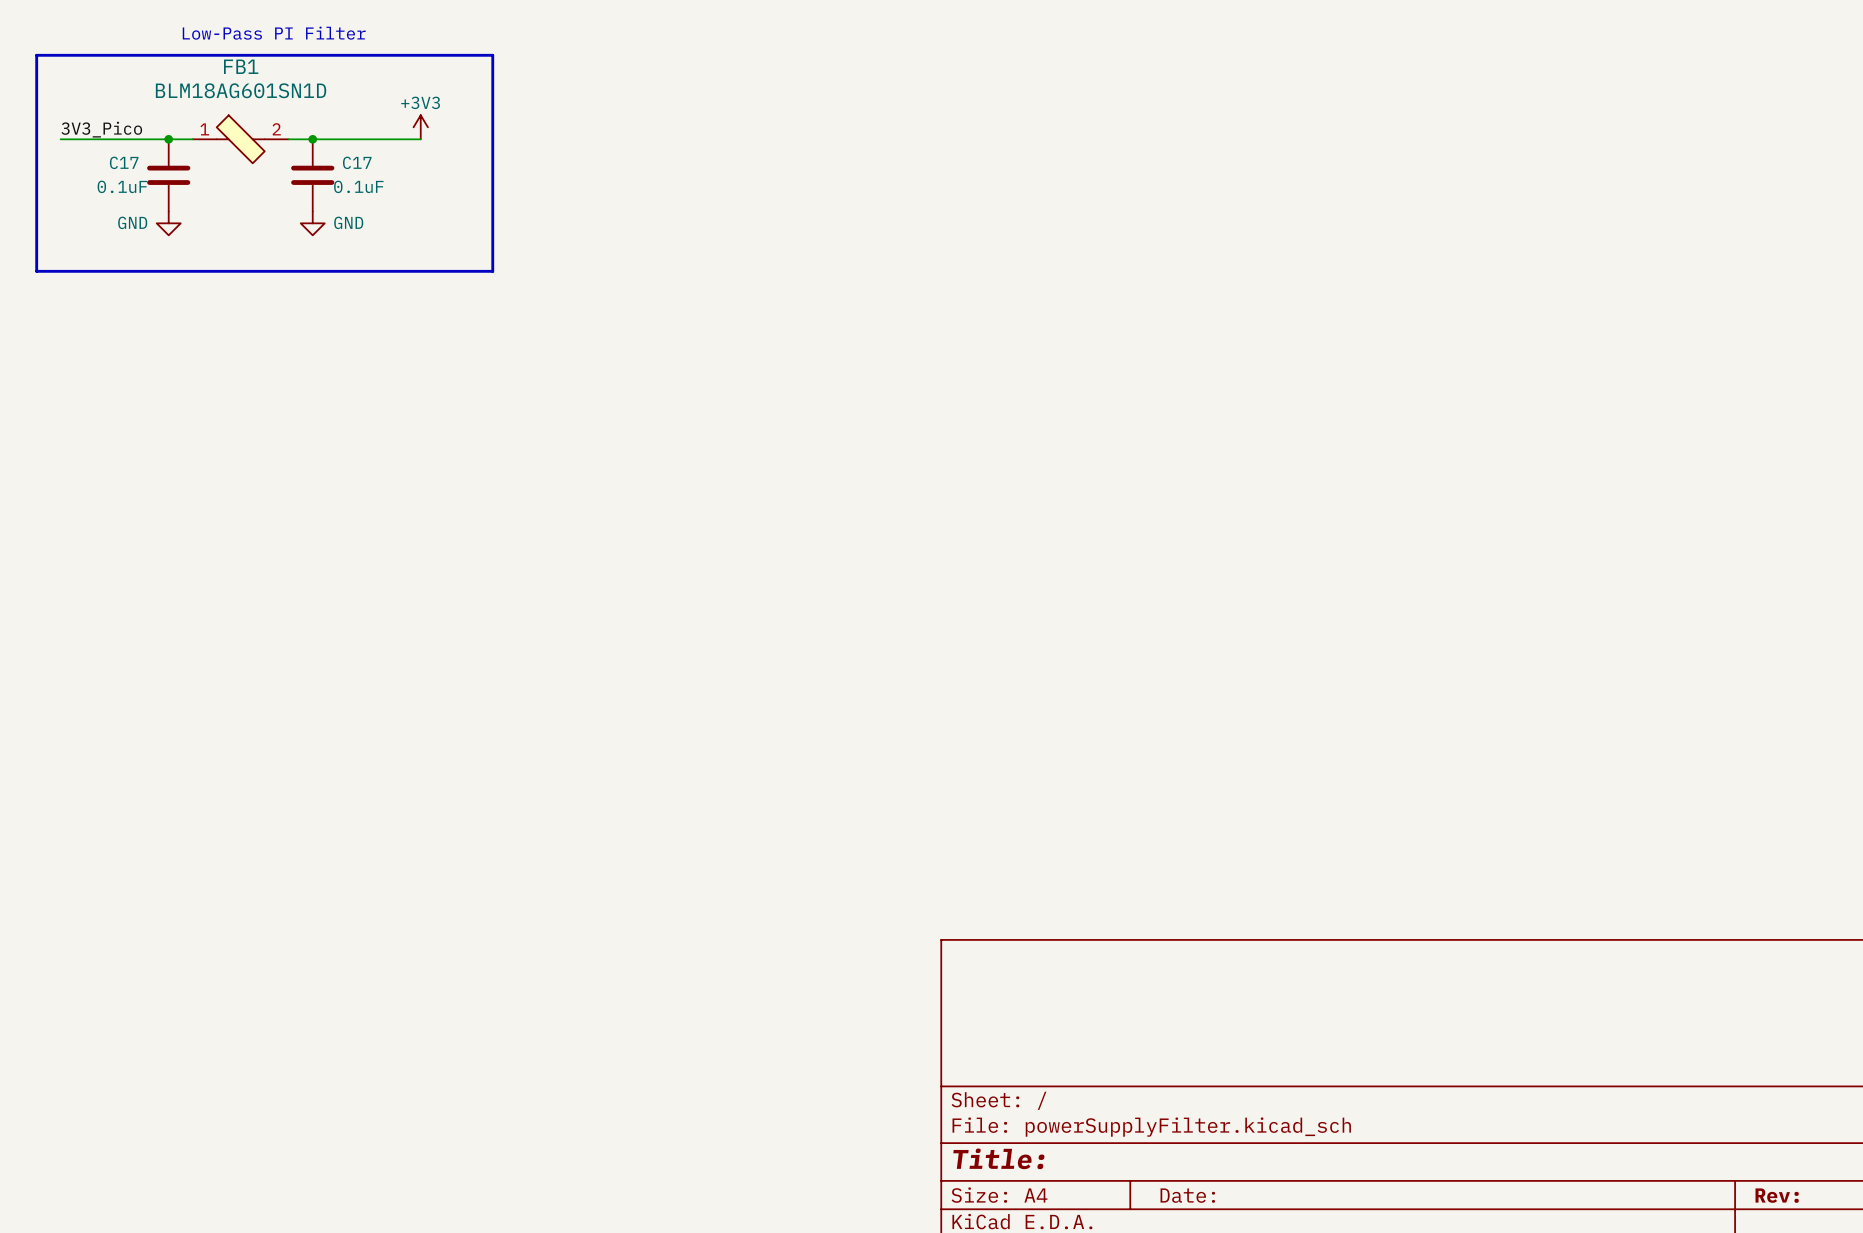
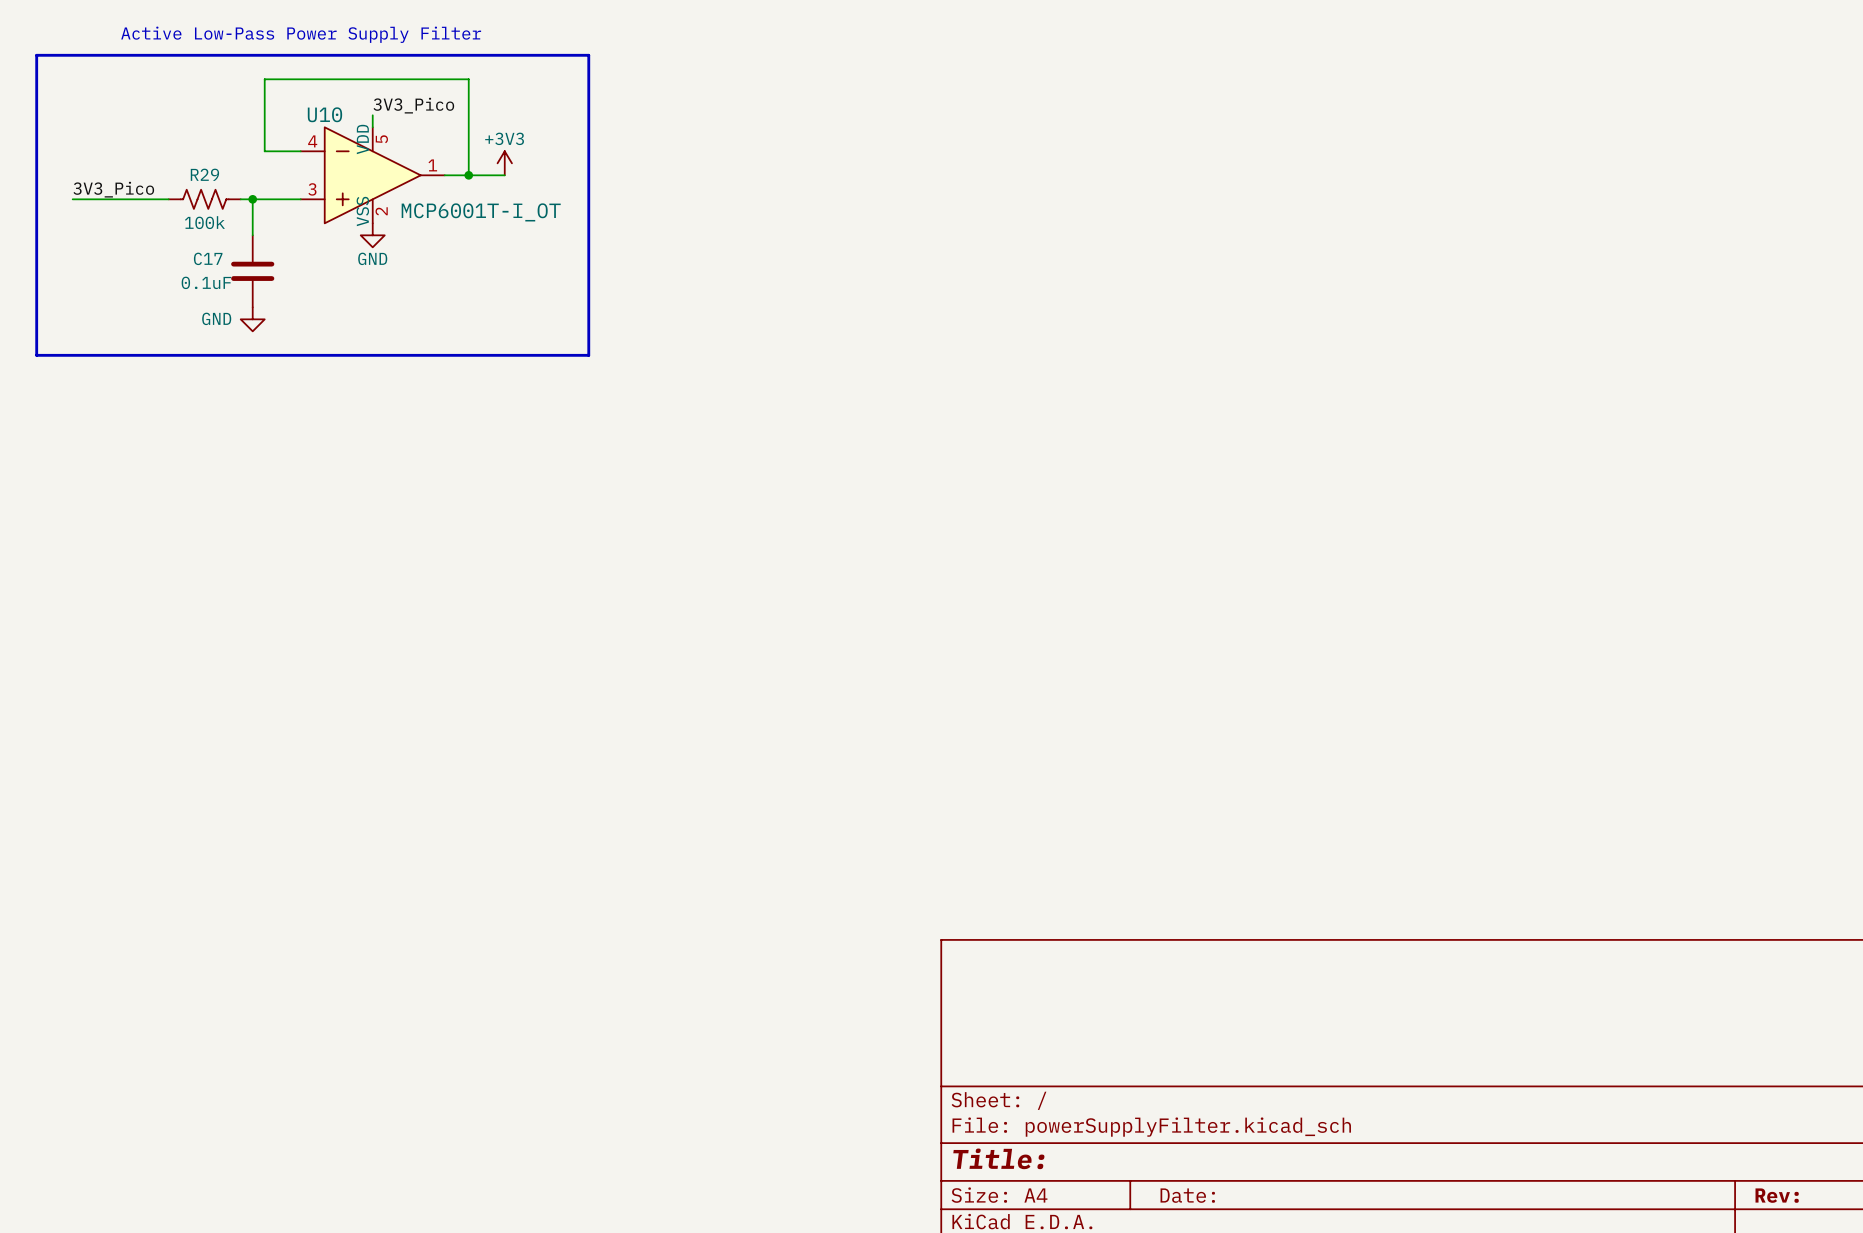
text: Low-Pass PI Filter (274, 33) -> Active Low-Pass Power Supply Filter (301, 34)
line: (492, 55) (492, 271) (36, 271) -> (492, 55) (588, 55) (588, 355) (36, 355) (36, 271)
label: none -> 3V3_Pico (413, 105)
wire: none -> (372, 115) (372, 127)
power symbol position: +3V3 (420, 127) -> +3V3 (504, 163)
label position: 3V3_Pico (101, 129) -> 3V3_Pico (113, 189)
wire: (60, 139) (192, 139) -> none
junction: (168, 139) -> none
FB1: BLM18AG601SN1D (240, 139) -> none
wire: (288, 139) (420, 139) -> none
junction: (312, 139) -> none
wire: none -> (300, 151) (264, 151) (264, 79) (468, 79) (468, 175)
C17: 0.1uF (168, 175) -> none
C17: 0.1uF (312, 175) -> none
U10: none -> MCP6001T-I_OT (372, 175)
wire: none -> (444, 175) (504, 175)
junction: none -> (468, 175)
wire: none -> (72, 199) (168, 199)
R29: none -> 100k (204, 199)
wire: none -> (240, 199) (300, 199)
wire: none -> (252, 199) (252, 235)
junction: none -> (252, 199)
power symbol: GND (168, 223) -> none
power symbol: GND (312, 223) -> none
power symbol: none -> GND (372, 235)
C17: none -> 0.1uF (252, 271)
power symbol: none -> GND (252, 319)

